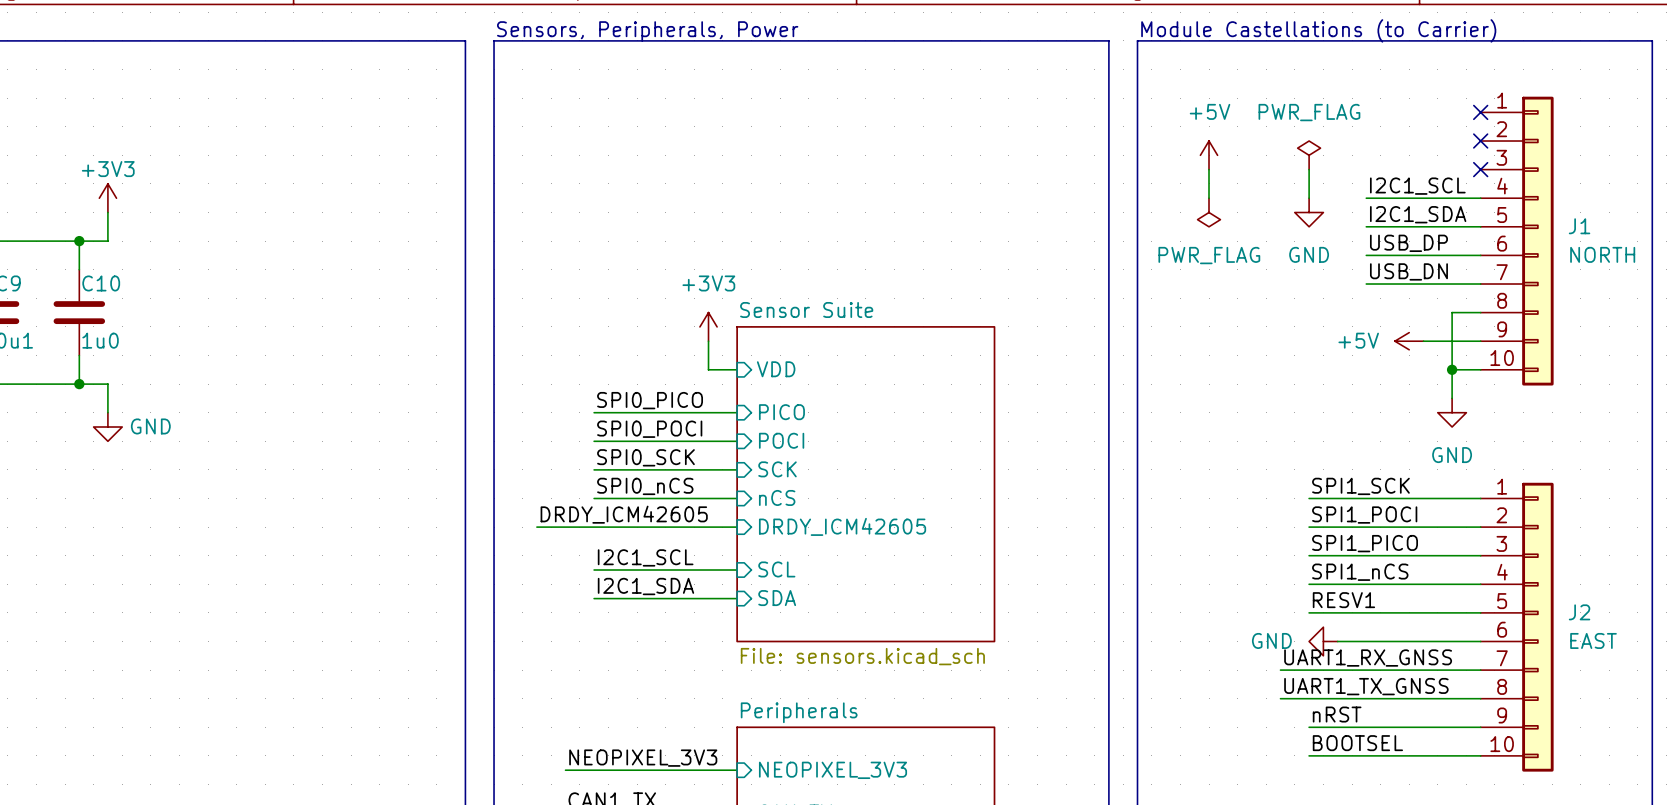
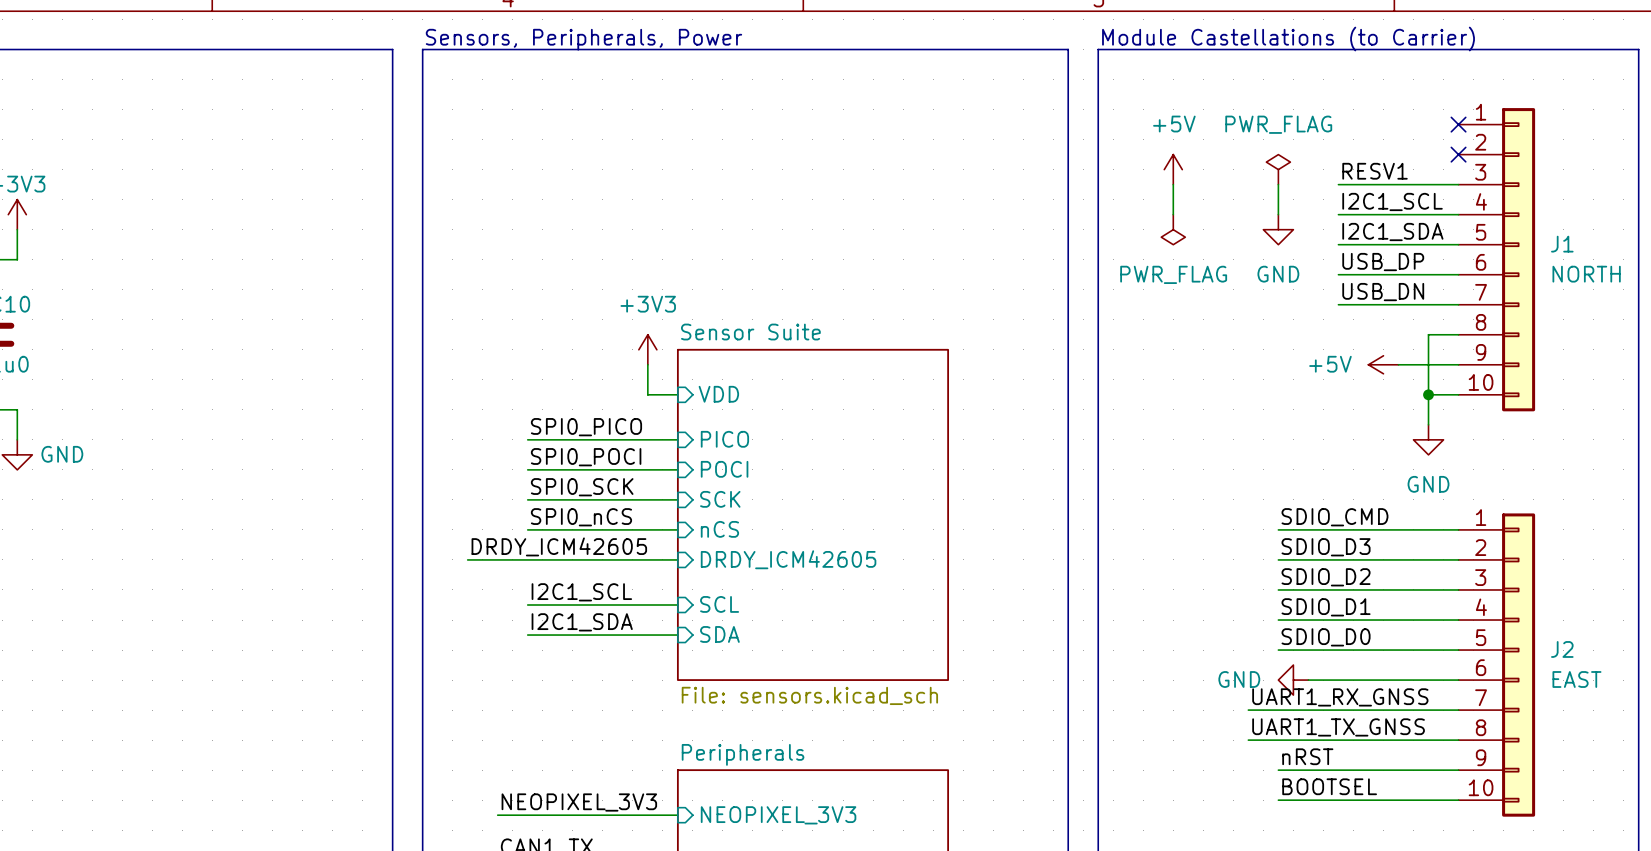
label: none -> RESV1 (1375, 171)
wire: none -> (1338, 184) (1458, 184)
no-connect mark: (1480, 169) -> none
label: SPI1_SCK (1360, 486) -> SDIO_CMD (1334, 517)
label: SPI1_POCI (1364, 515) -> SDIO_D3 (1326, 547)
label: SPI1_PICO (1365, 543) -> SDIO_D2 (1326, 577)
label: SPI1_nCS (1360, 572) -> SDIO_D1 (1326, 607)
label: RESV1 (1343, 600) -> SDIO_D0 (1326, 637)

